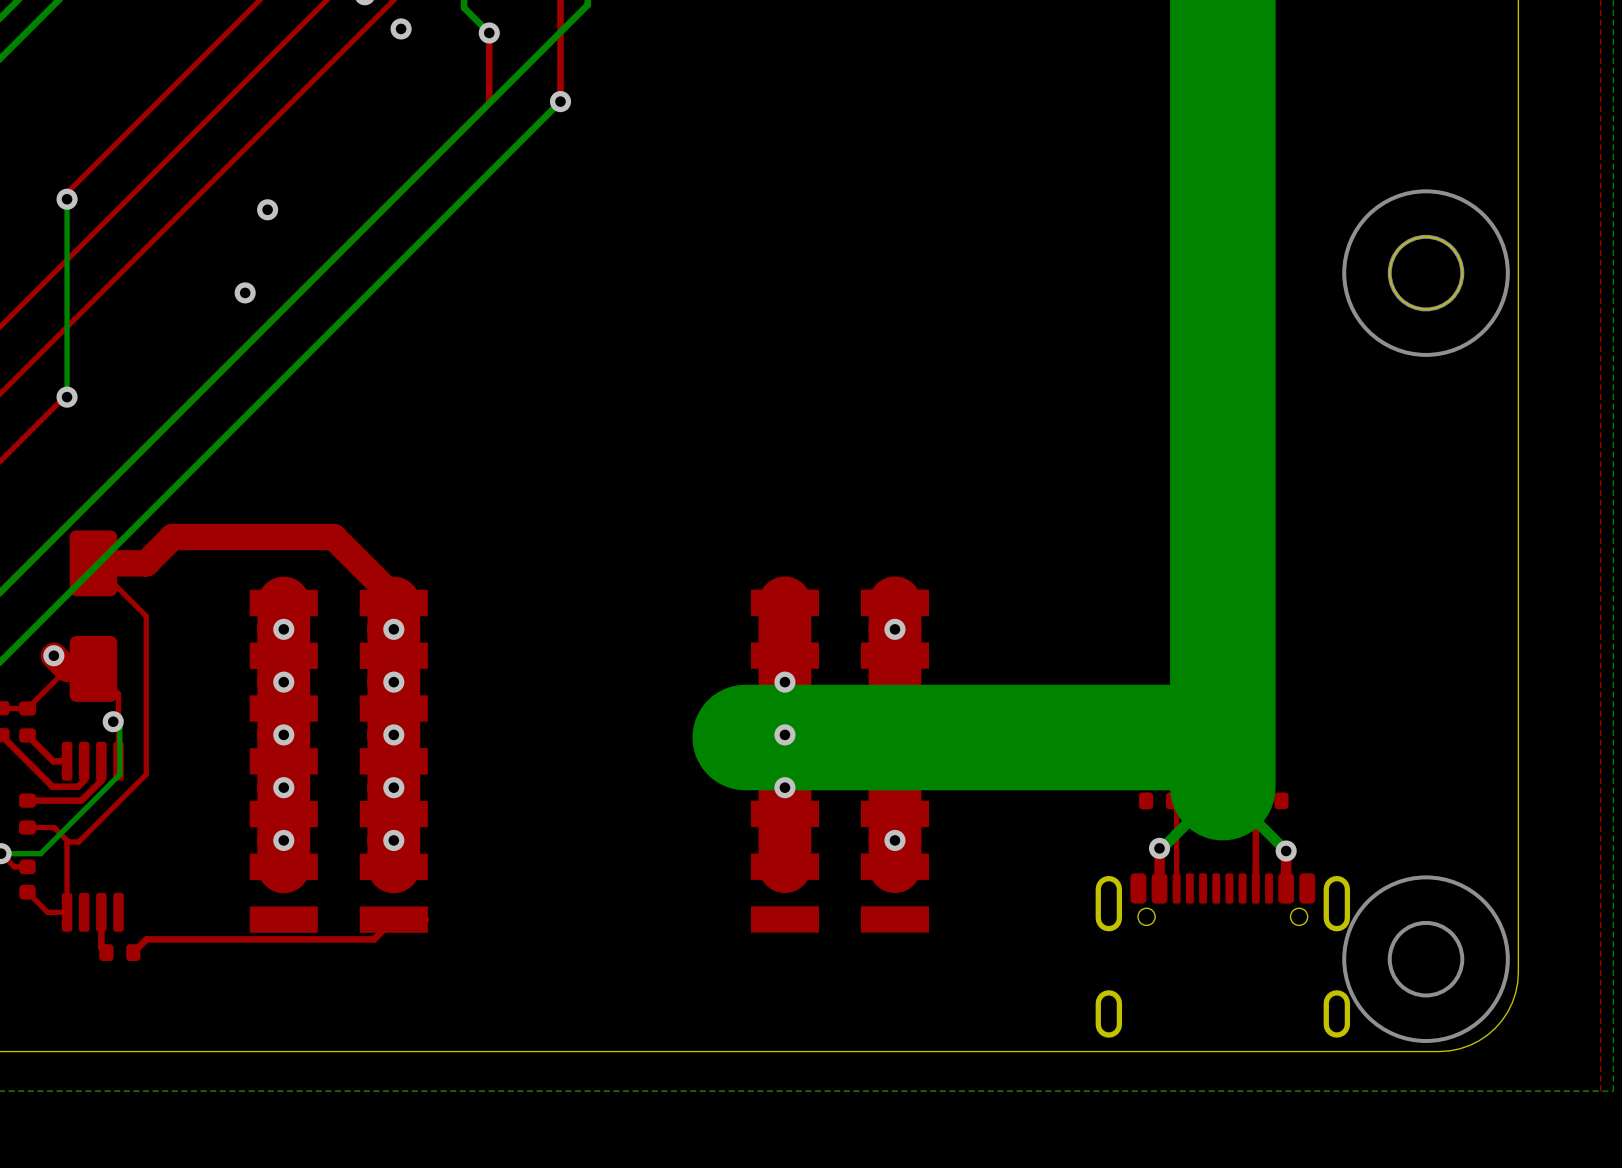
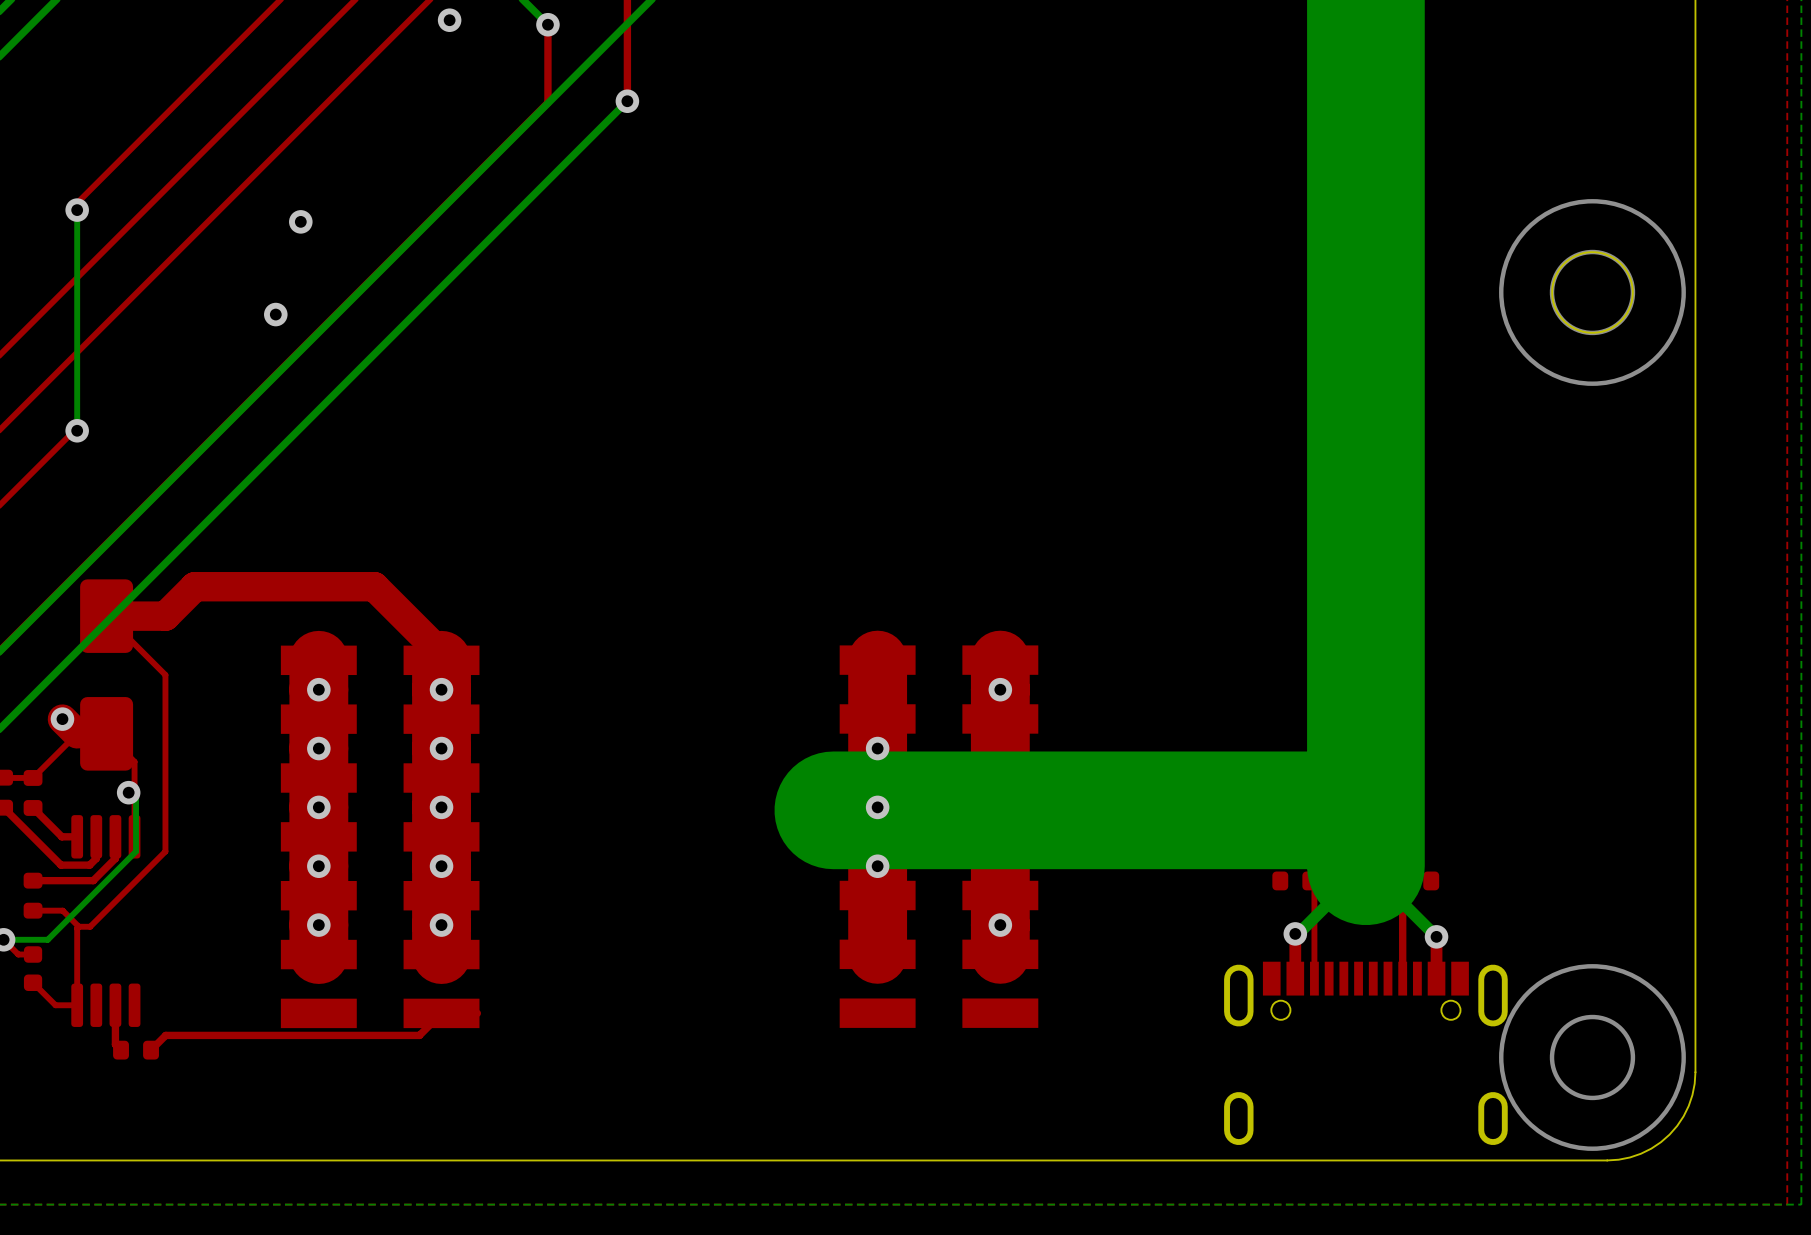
part footprint: [1095, 873, 1351, 1038] -> [1224, 961, 1508, 1146]

